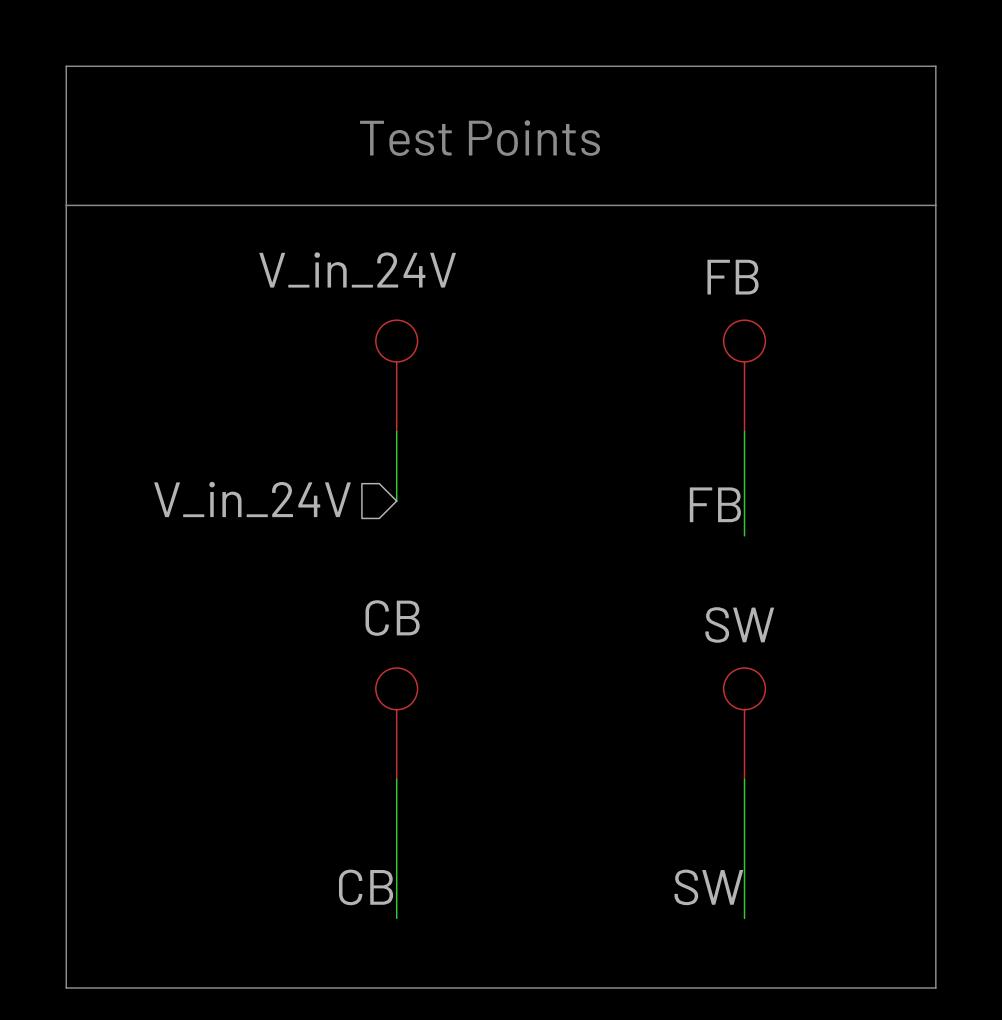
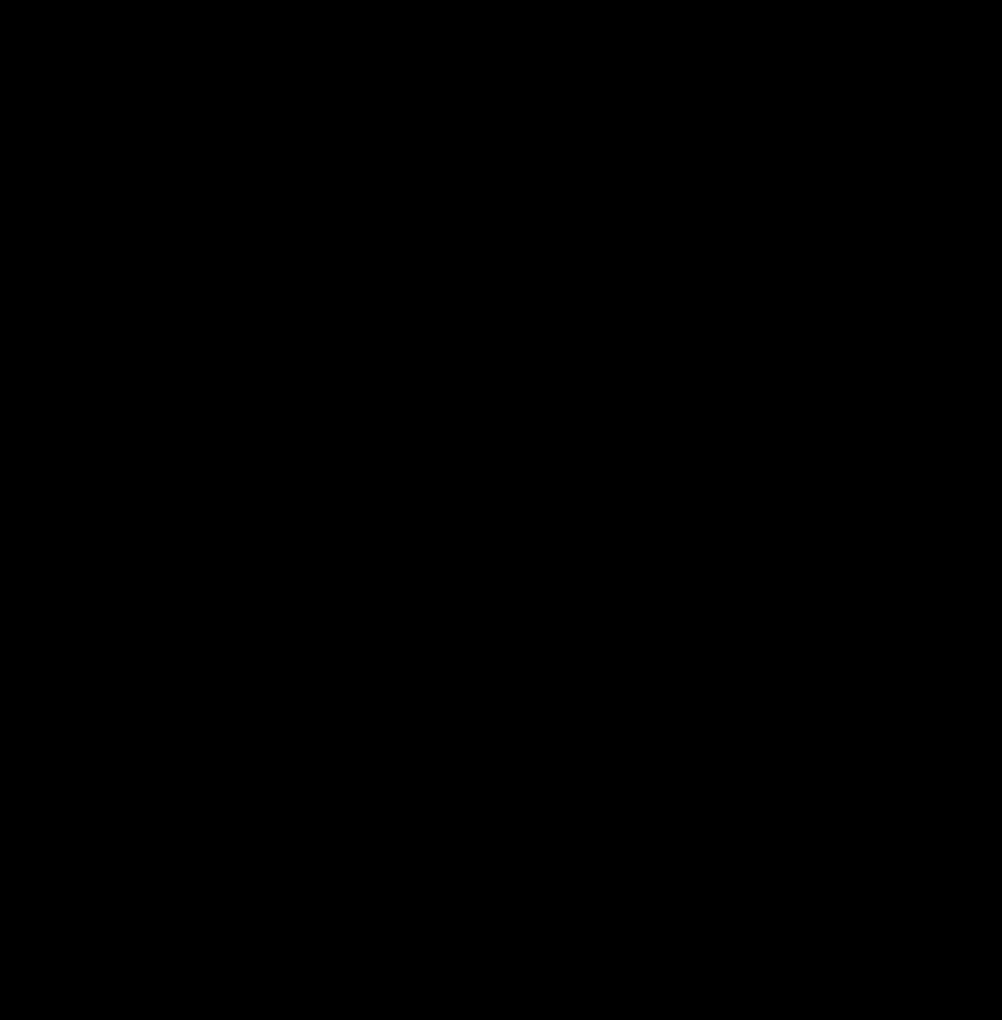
line: (66, 66) (935, 66) (935, 987) (66, 987) (66, 66) -> none
text: Test Points (480, 138) -> none
line: (66, 205) (935, 205) -> none
part: V_in_24V (396, 375) -> none
part: FB (744, 375) -> none
wire: (396, 431) (396, 501) -> none
wire: (744, 431) (744, 535) -> none
hierarchical label: V_in_24V (252, 499) -> none
label: FB (715, 504) -> none
part: CB (396, 723) -> none
part: SW (744, 723) -> none
wire: (396, 779) (396, 918) -> none
wire: (744, 779) (744, 918) -> none
label: CB (366, 887) -> none
label: SW (708, 887) -> none

